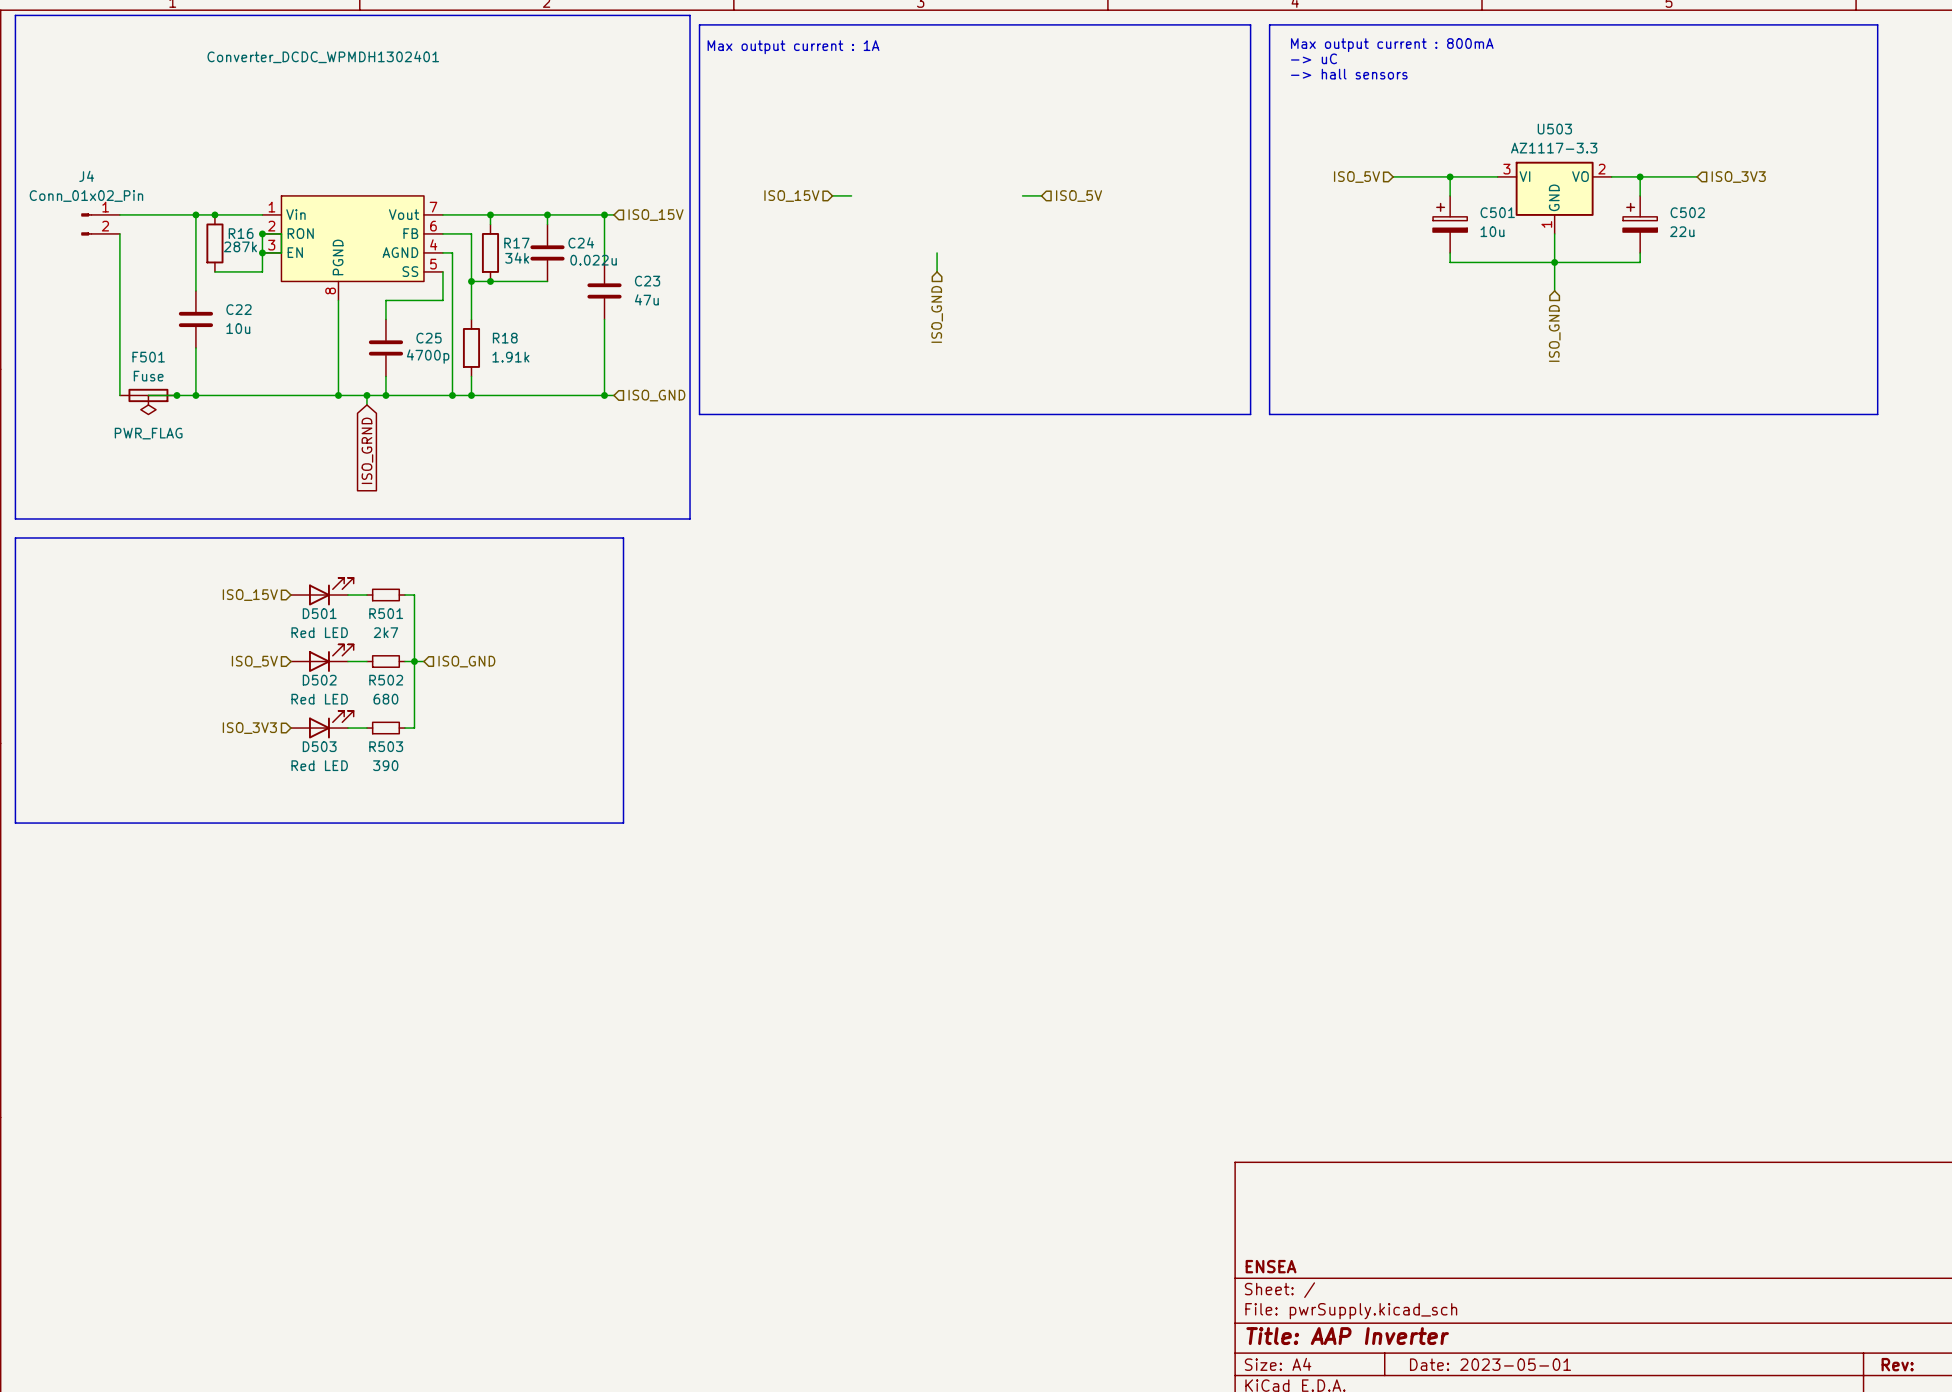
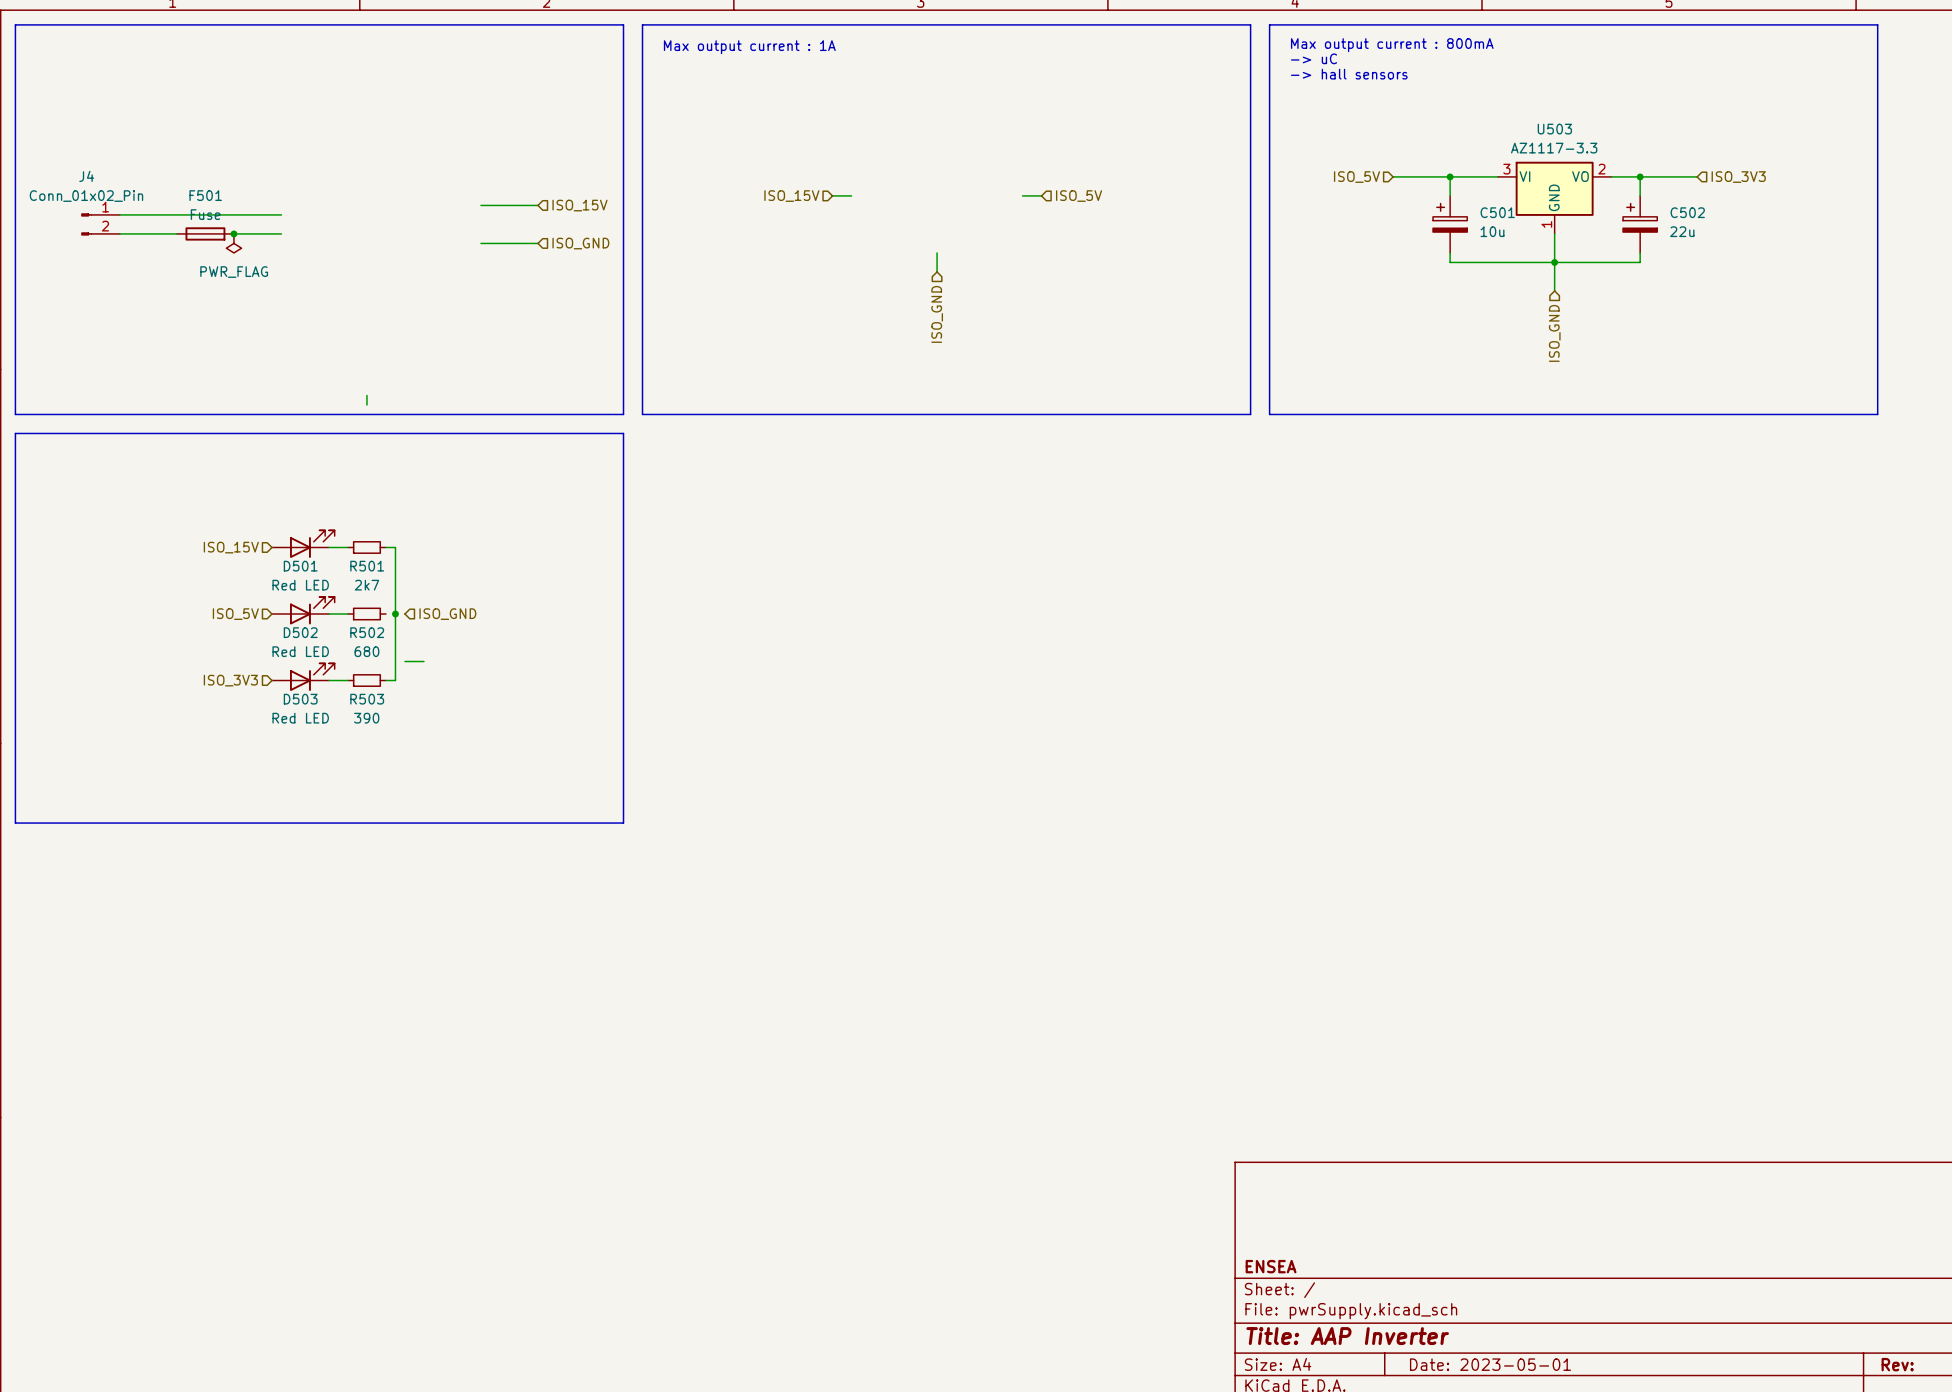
line: (15, 24) (15, 15) (690, 15) (690, 518) (15, 518) -> (15, 24) (623, 24) (623, 414) (15, 414)
line: (699, 24) (699, 414) -> (699, 24) (642, 24) (642, 414) (699, 414)
text position: Max output current : 1A (793, 47) -> Max output current : 1A (749, 47)
wire: none -> (480, 205) (537, 205)
wire: (195, 214) (195, 290) -> none
junction: (195, 214) -> none
junction: (214, 214) -> none
wire: (442, 214) (614, 214) -> none
wire: (490, 214) (490, 224) -> none
junction: (490, 214) -> none
wire: (547, 214) (547, 224) -> none
junction: (547, 214) -> none
wire: (604, 214) (604, 262) -> none
junction: (604, 214) -> none
hierarchical label position: ISO_15V (656, 215) -> ISO_15V (579, 205)
wire: (119, 233) (119, 395) -> (119, 233) (176, 233)
junction: none -> (233, 233)
wire: (262, 233) (262, 271) (214, 271) -> (262, 233) (233, 233)
junction: (262, 233) -> none
wire: (281, 233) (281, 252) (262, 252) -> none
wire: (442, 233) (471, 233) (471, 319) -> none
R16: 287k (214, 243) -> none
wire: none -> (480, 243) (537, 243)
hierarchical label: none -> ISO_GND (580, 243)
Converter_DCDC_WPMDH1302401: (352, 248) -> none
junction: (262, 252) -> none
wire: (442, 252) (452, 252) (452, 395) -> none
R17: 34k (490, 252) -> none
C24: 0.022u (547, 252) -> none
wire: (442, 271) (442, 300) (385, 300) (385, 319) -> none
wire: (471, 281) (547, 281) -> none
junction: (471, 281) -> none
junction: (490, 281) -> none
C23: 47u (604, 290) -> none
wire: (338, 300) (338, 395) -> none
C22: 10u (195, 319) -> none
wire: (604, 319) (604, 395) -> none
wire: (195, 347) (195, 395) -> none
C25: 4700p (385, 347) -> none
R18: 1.91k (471, 347) -> none
wire: (385, 376) (385, 395) -> none
wire: (471, 376) (471, 395) -> none
wire: (148, 395) (614, 395) -> none
F501 position: (148, 395) -> (205, 233)
junction: (176, 395) -> none
junction: (195, 395) -> none
junction: (338, 395) -> none
junction: (366, 395) -> none
junction: (385, 395) -> none
junction: (452, 395) -> none
junction: (471, 395) -> none
junction: (604, 395) -> none
hierarchical label: ISO_GND (656, 395) -> none
power symbol position: PWR_FLAG (148, 404) -> PWR_FLAG (233, 243)
line: (15, 414) (15, 433) -> (15, 518) (15, 537)
global label: ISO_GRND (367, 450) -> none
line: (15, 537) (623, 537) -> (15, 433) (623, 433) (623, 537)
D501 position: (322, 591) -> (303, 544)
hierarchical label position: ISO_15V (250, 595) -> ISO_15V (231, 547)
wire: (347, 595) (366, 595) -> (328, 547) (347, 547)
R501 position: (385, 595) -> (366, 547)
wire: (404, 595) (414, 595) (414, 728) (404, 728) -> (385, 547) (395, 547) (395, 680) (385, 680)
junction: none -> (395, 614)
D502 position: (322, 658) -> (303, 610)
hierarchical label position: ISO_5V (254, 661) -> ISO_5V (235, 614)
wire: (347, 661) (366, 661) -> (328, 614) (347, 614)
R502 position: (385, 661) -> (366, 614)
junction: (414, 661) -> none
hierarchical label position: ISO_GND (466, 661) -> ISO_GND (447, 614)
D503 position: (322, 724) -> (303, 677)
hierarchical label position: ISO_3V3 (249, 728) -> ISO_3V3 (230, 680)
wire: (347, 728) (366, 728) -> (328, 680) (347, 680)
R503 position: (385, 728) -> (366, 680)

